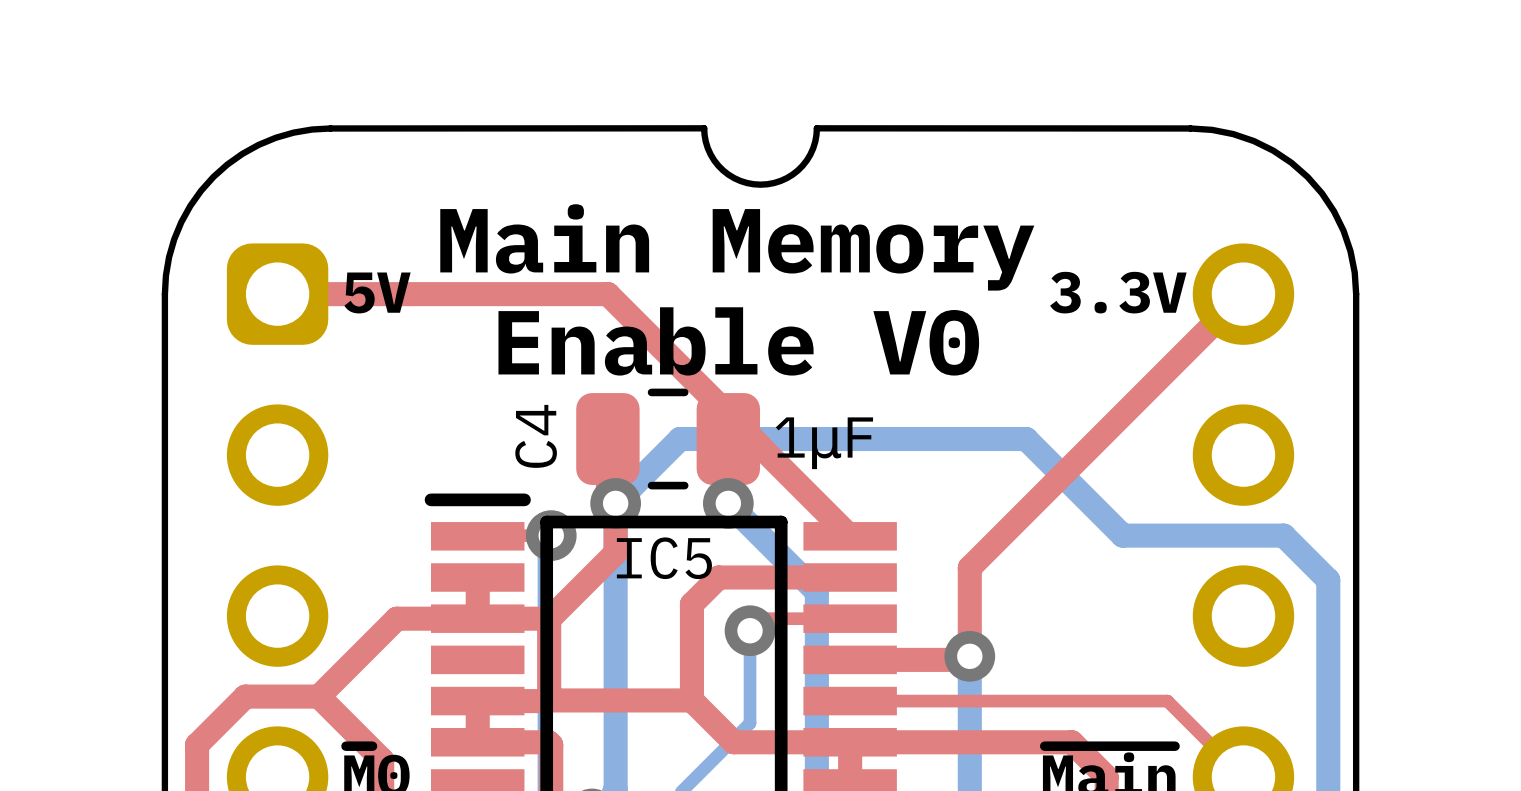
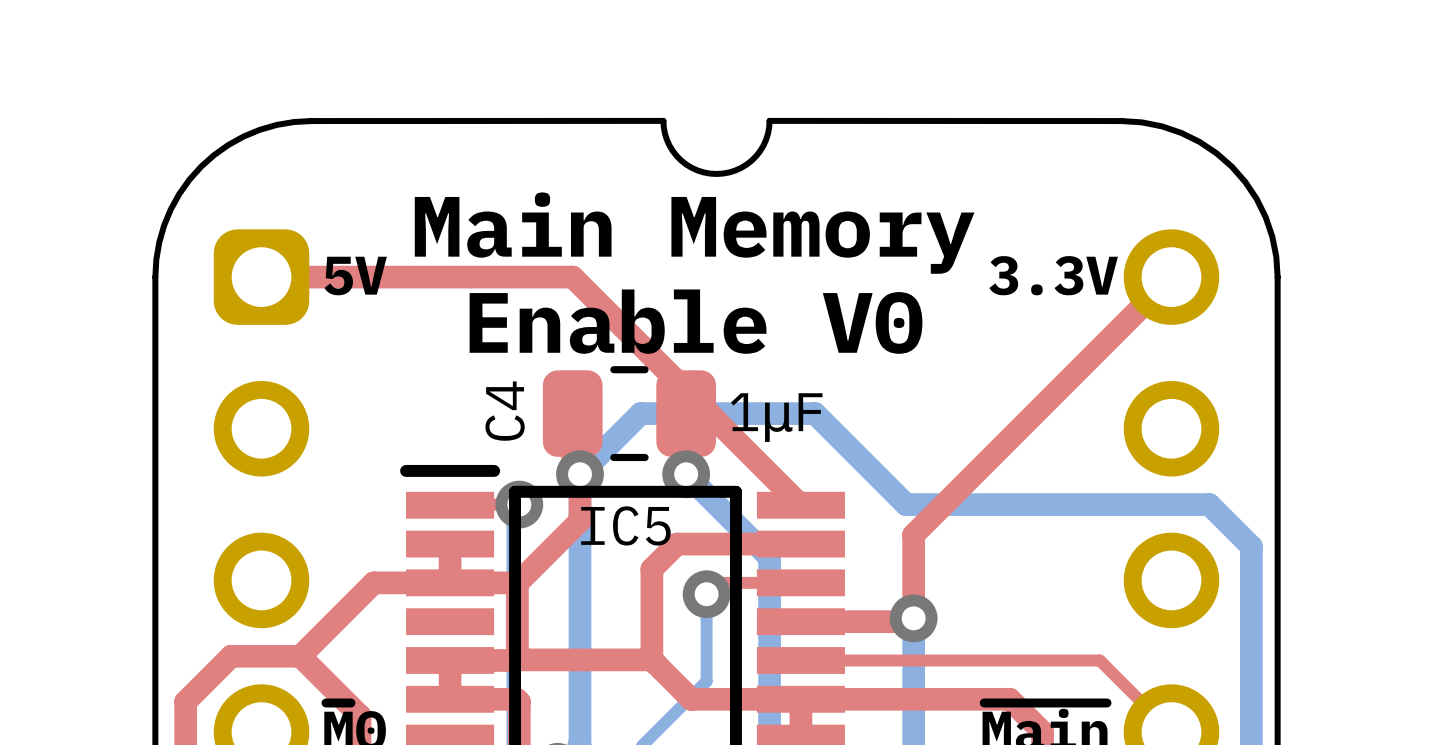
bottom track: (865, 439) (1026, 439) (1122, 535) -> (815, 413) (906, 504) (1057, 504)

